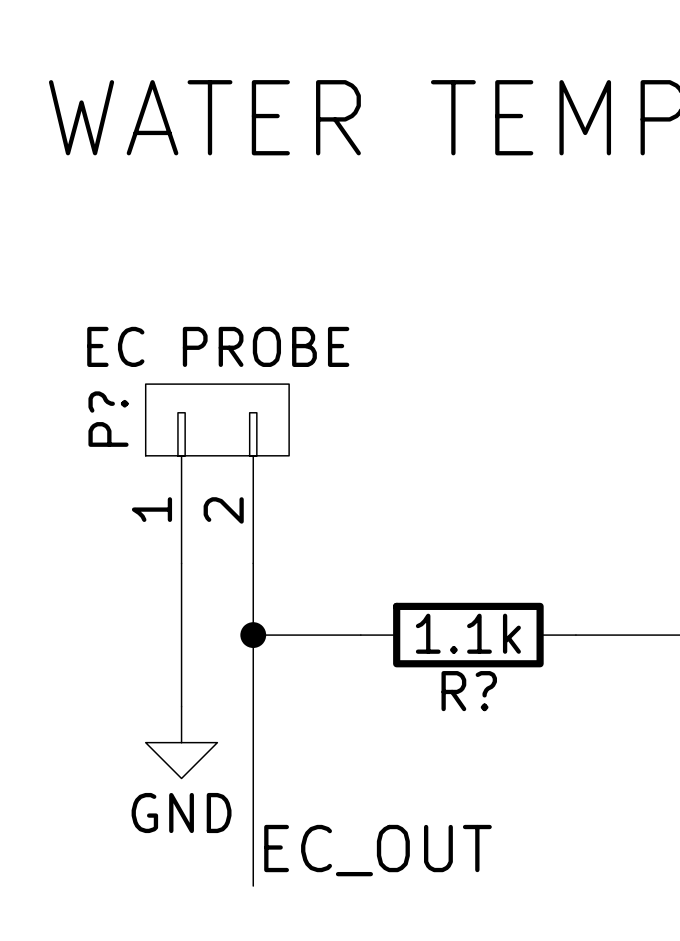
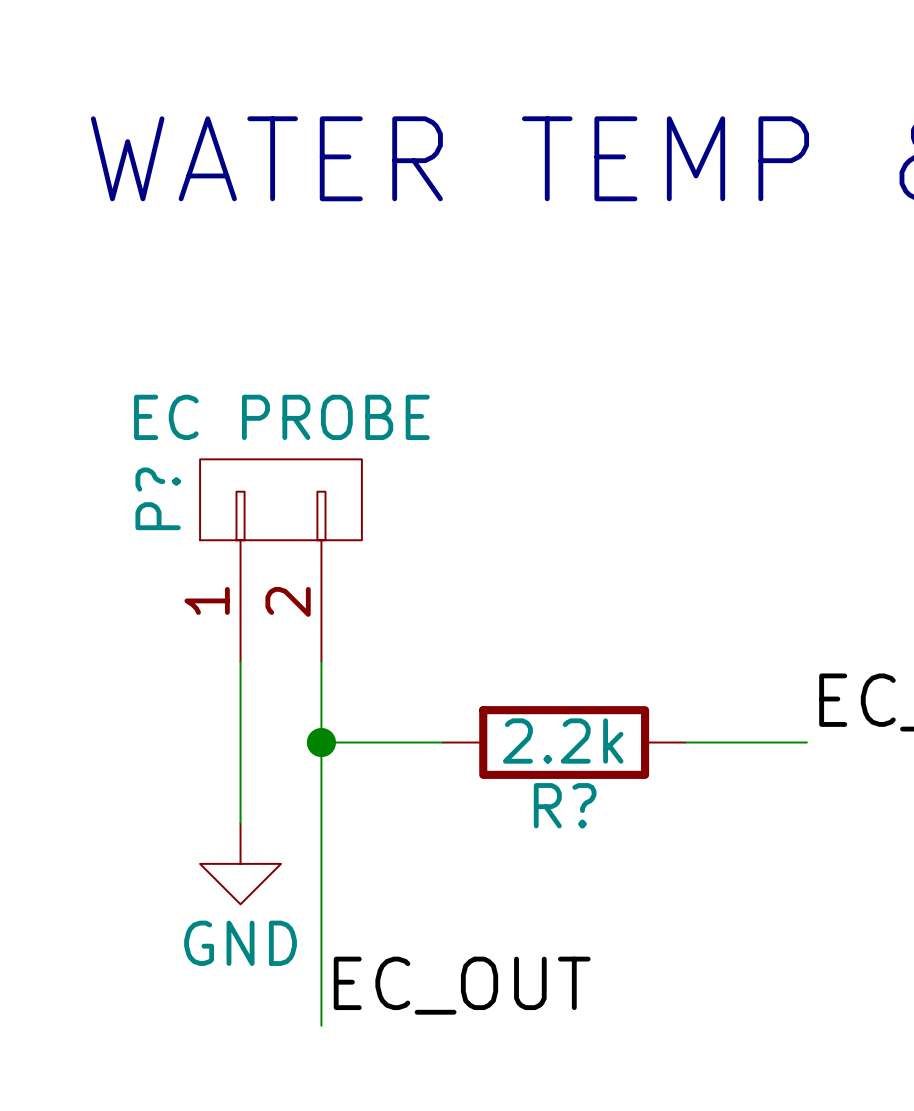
R? value: 1.1k (468, 633) -> 2.2k (563, 741)

